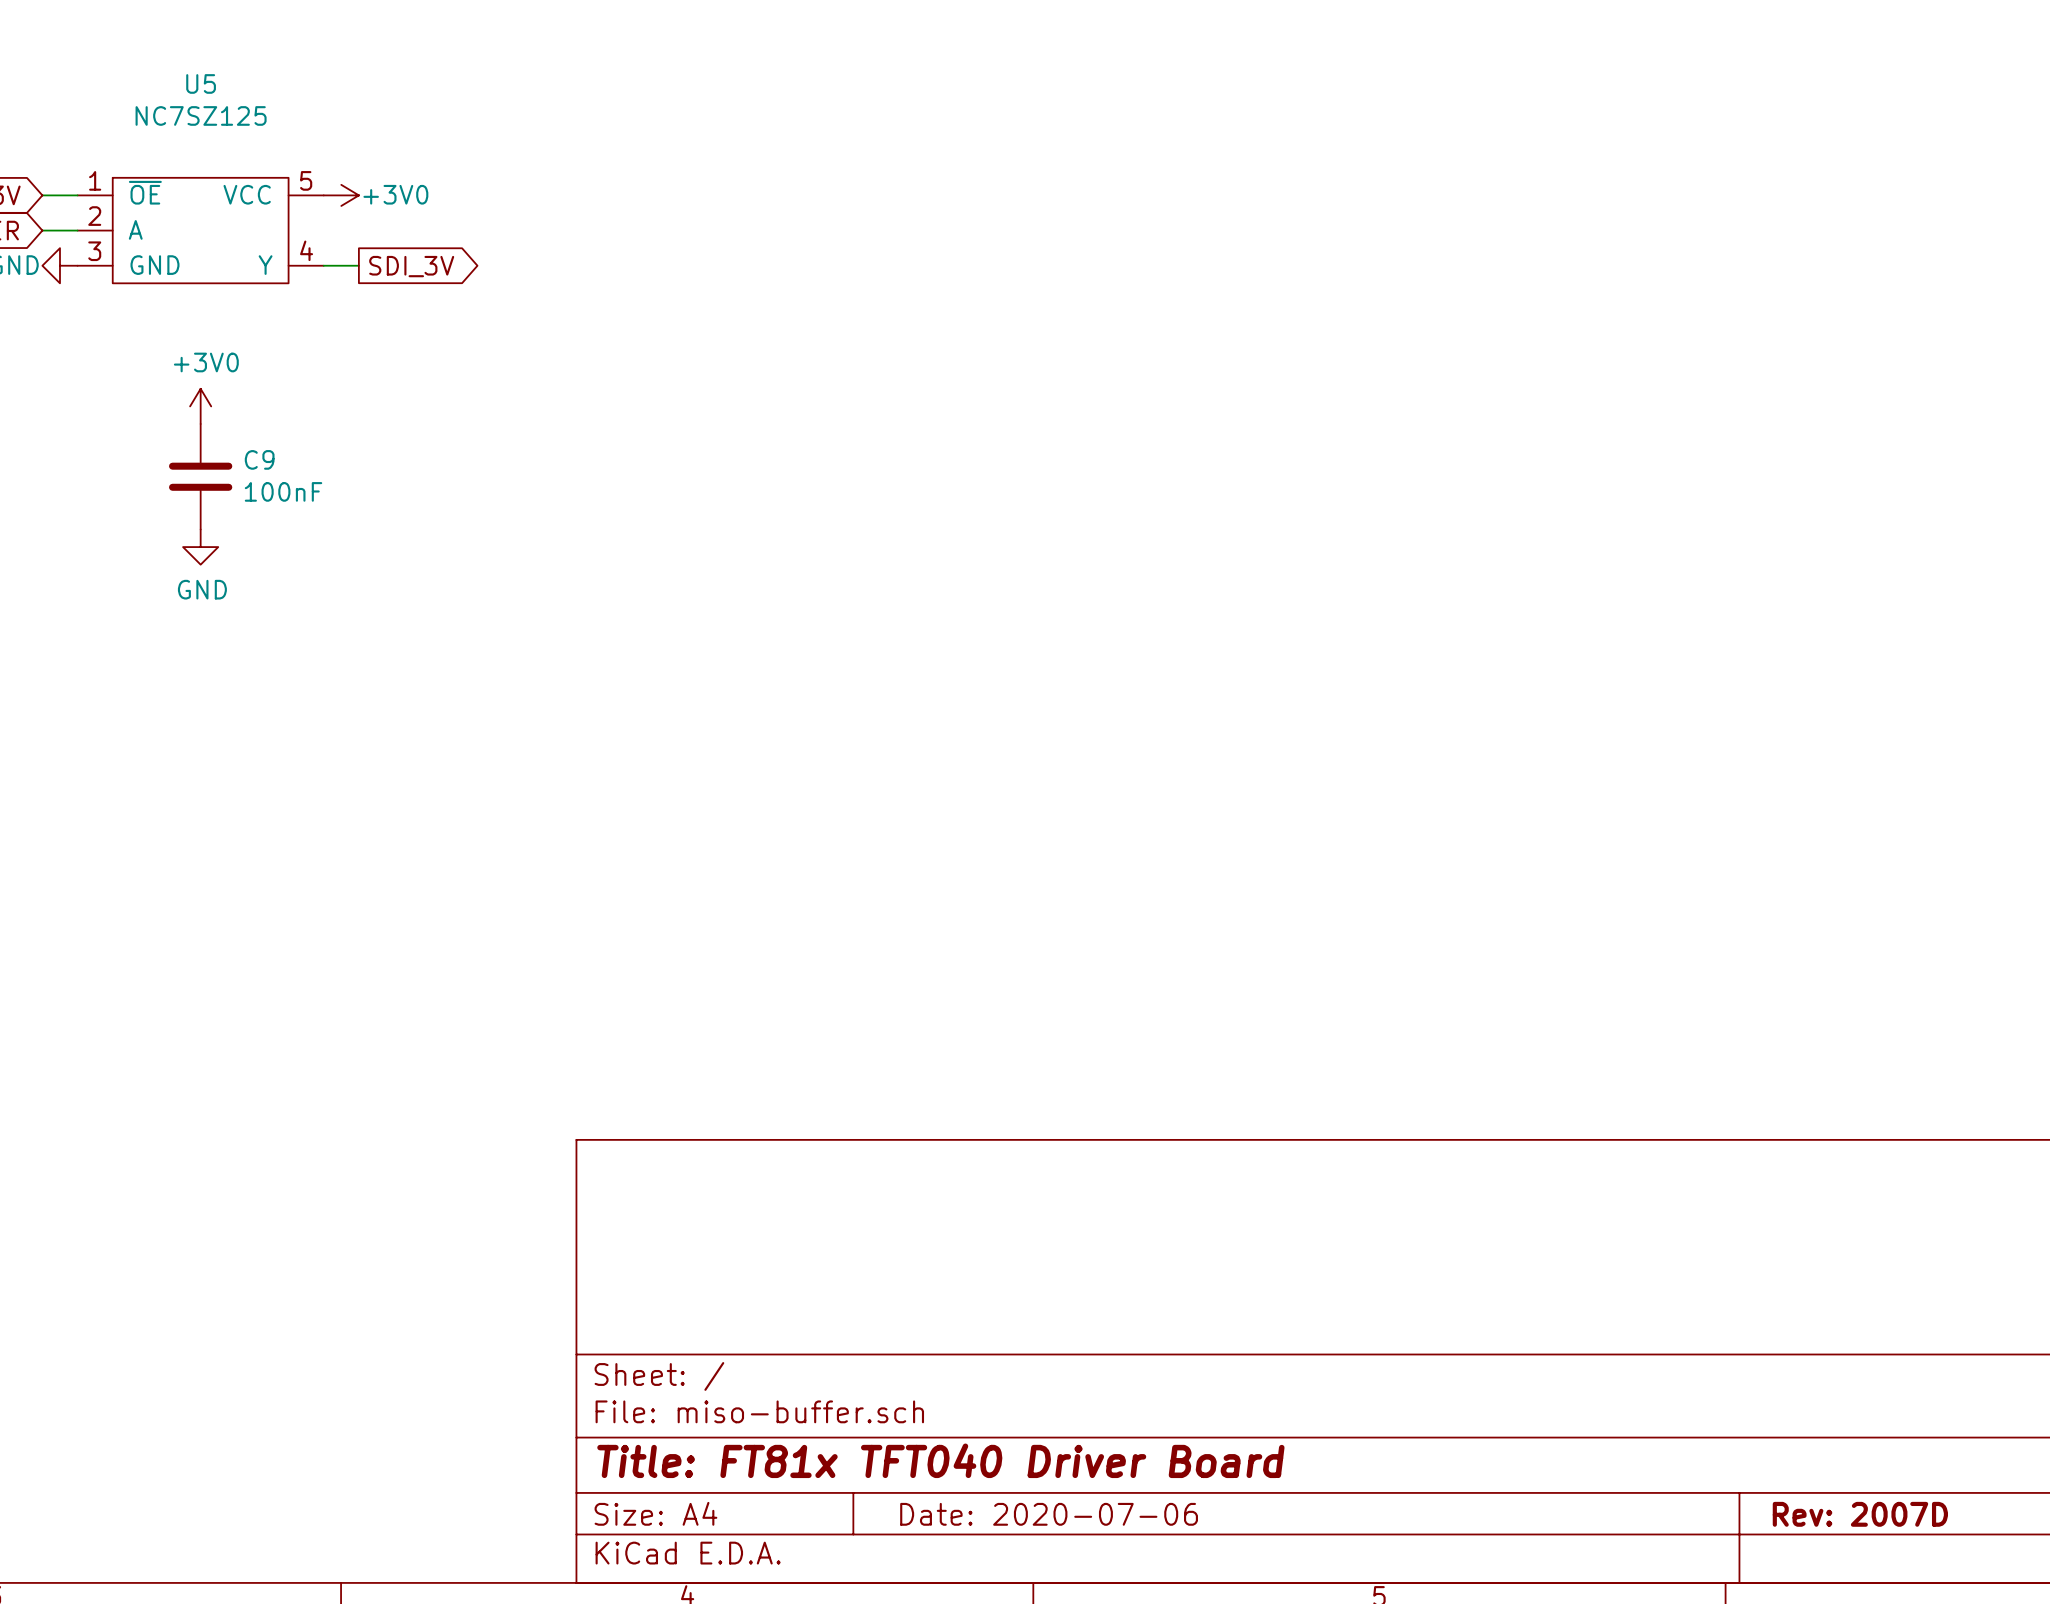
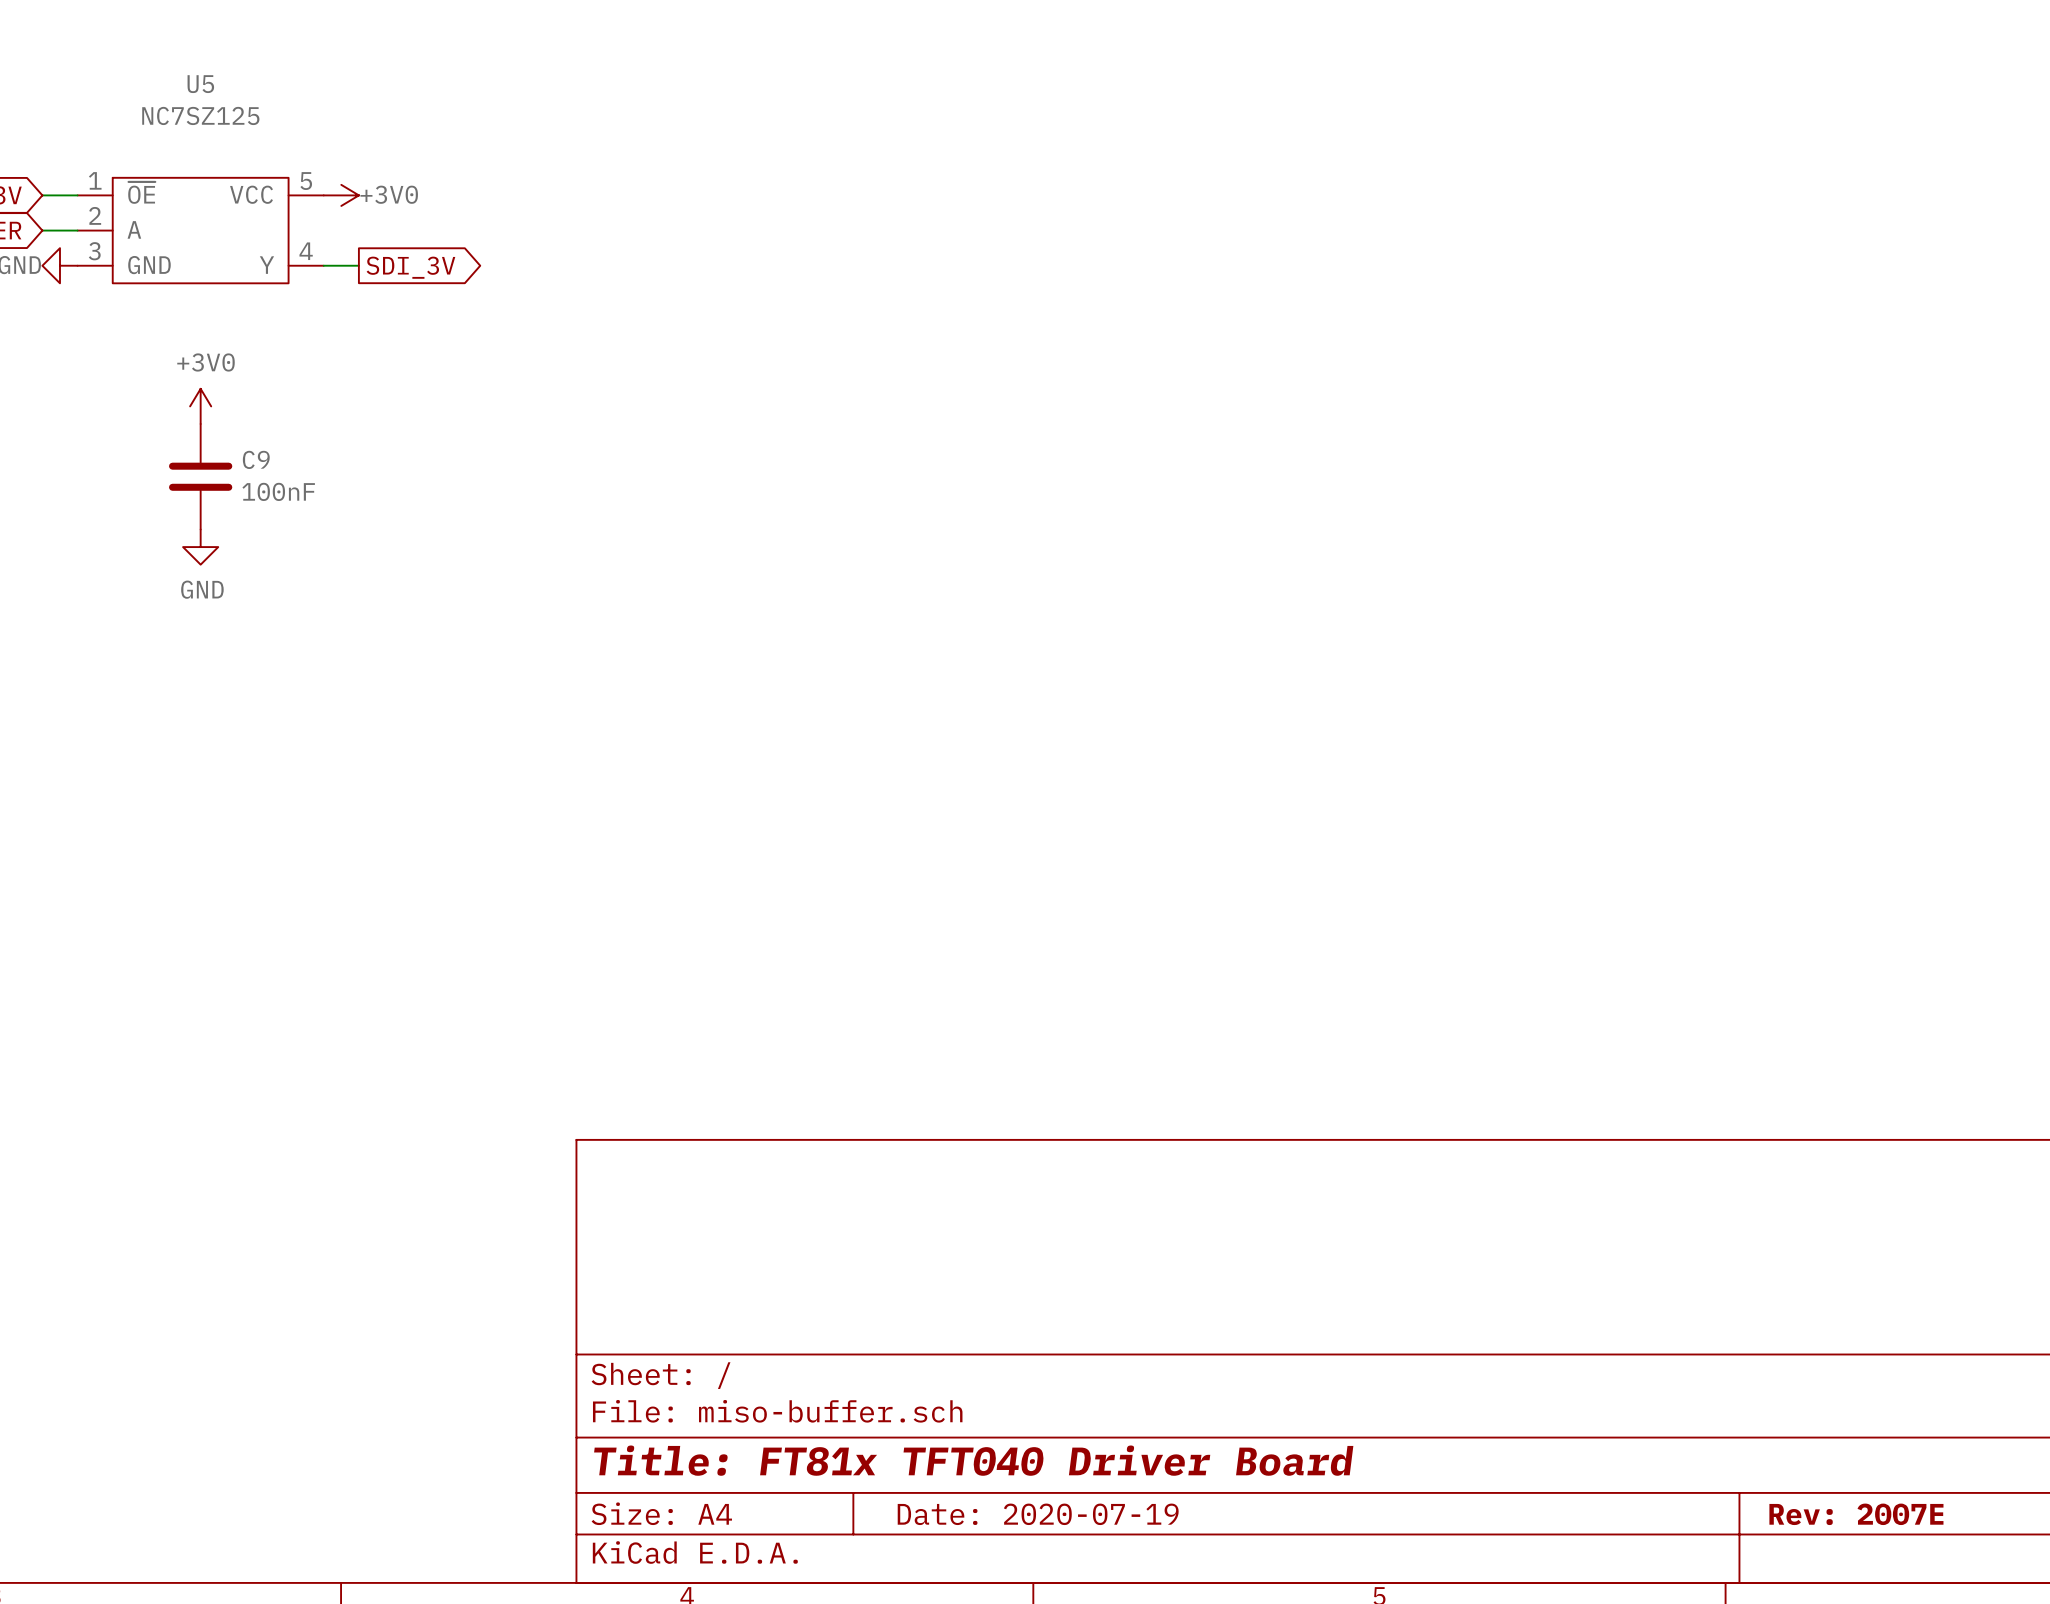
title block: Date: 2020-07-06 (1049, 1514) -> Date: 2020-07-19 (1038, 1514)
title block: Rev: 2007D (1860, 1514) -> Rev: 2007E (1856, 1514)

